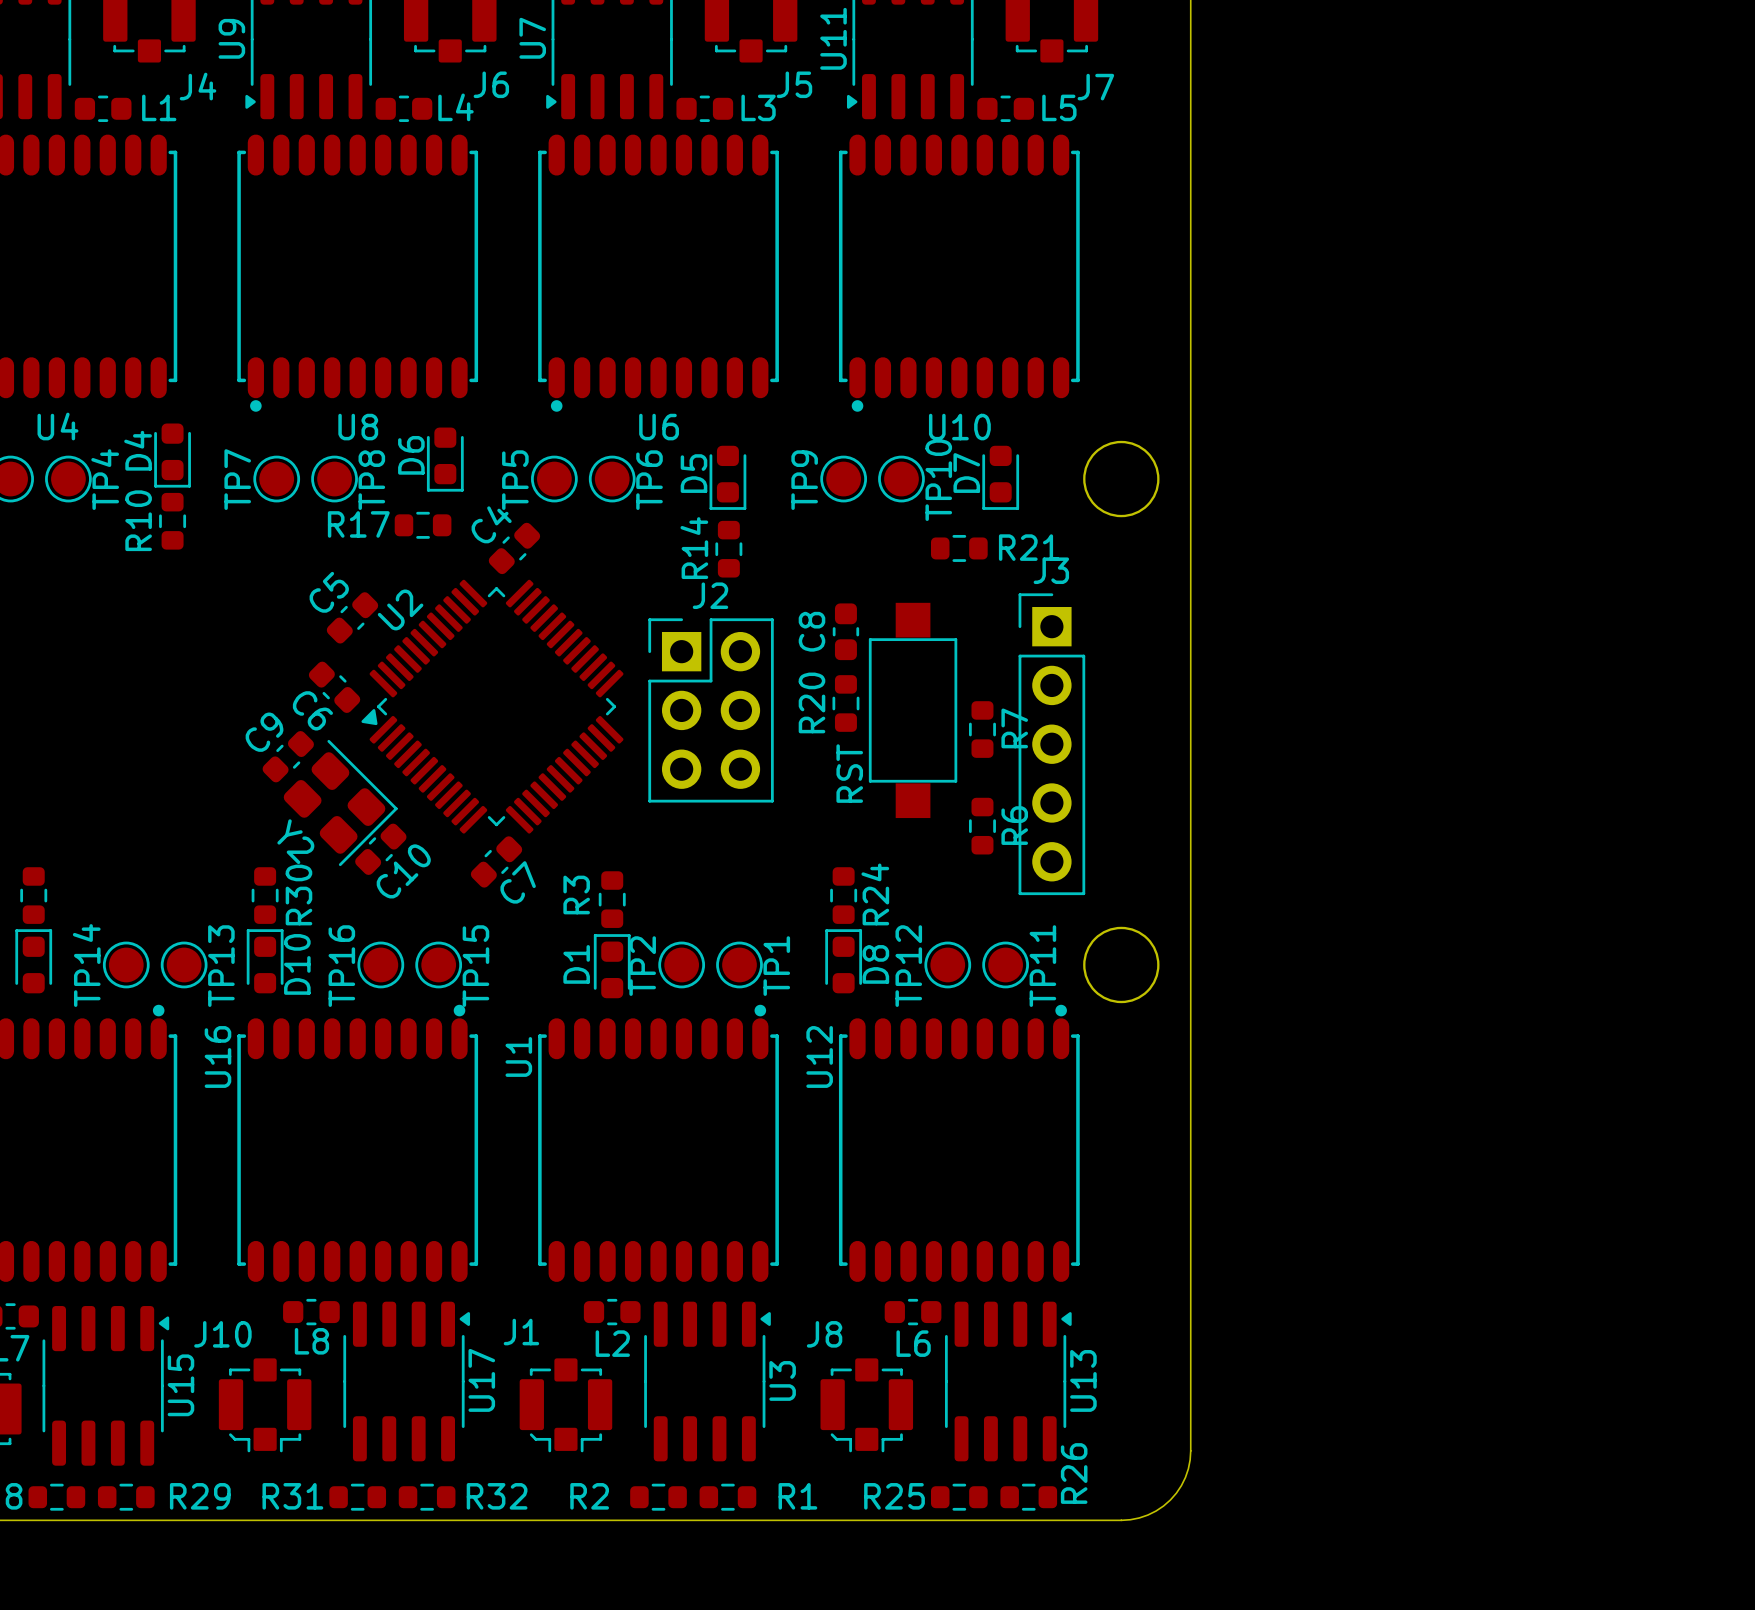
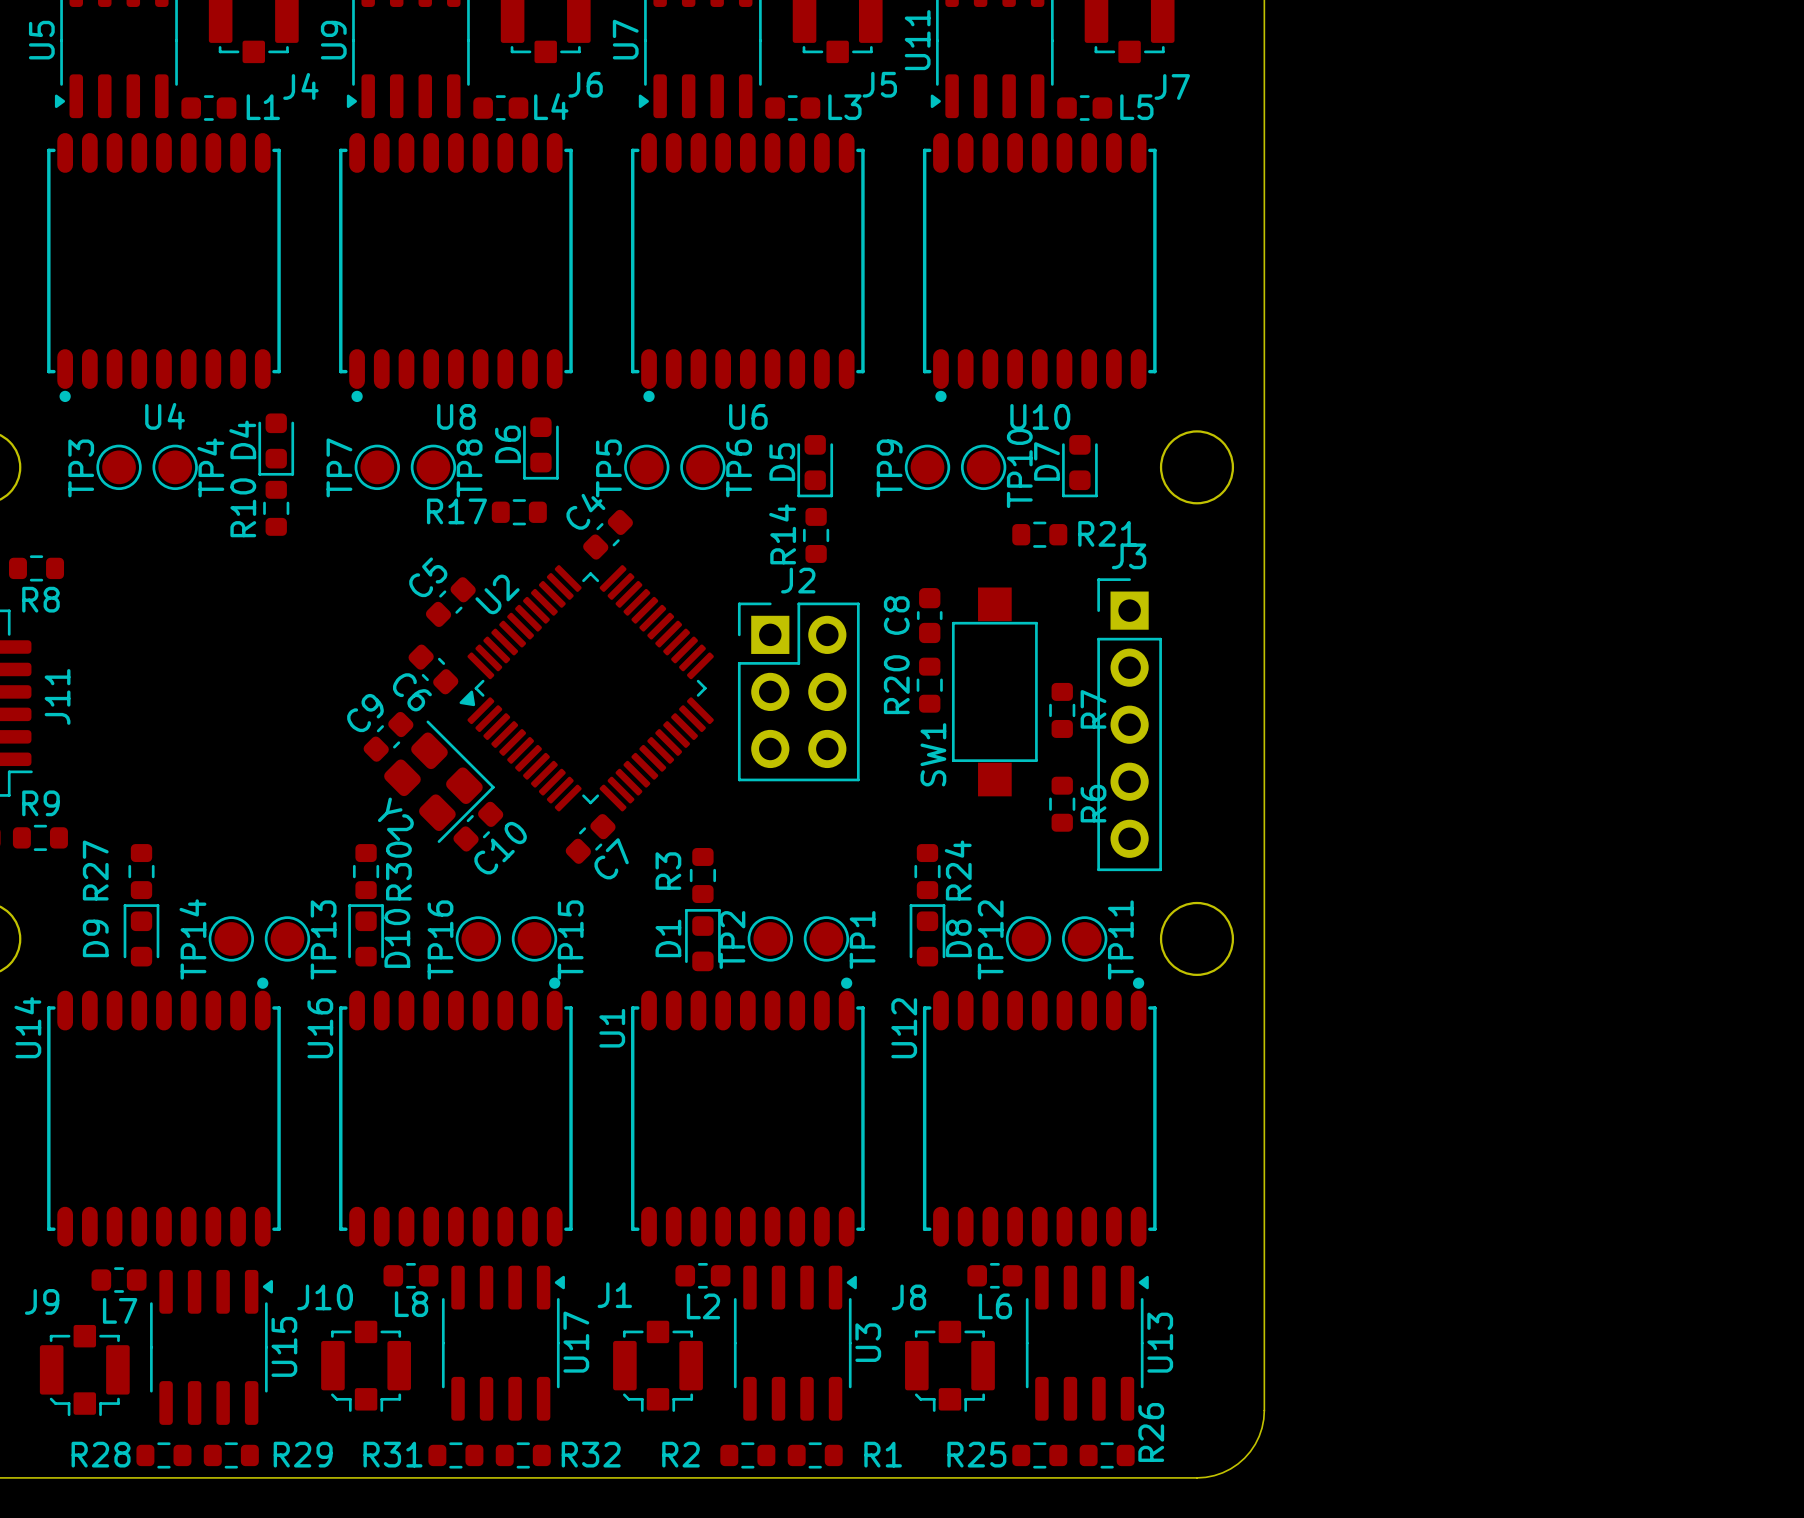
RST name: RST (849, 773) -> SW1 (933, 754)

